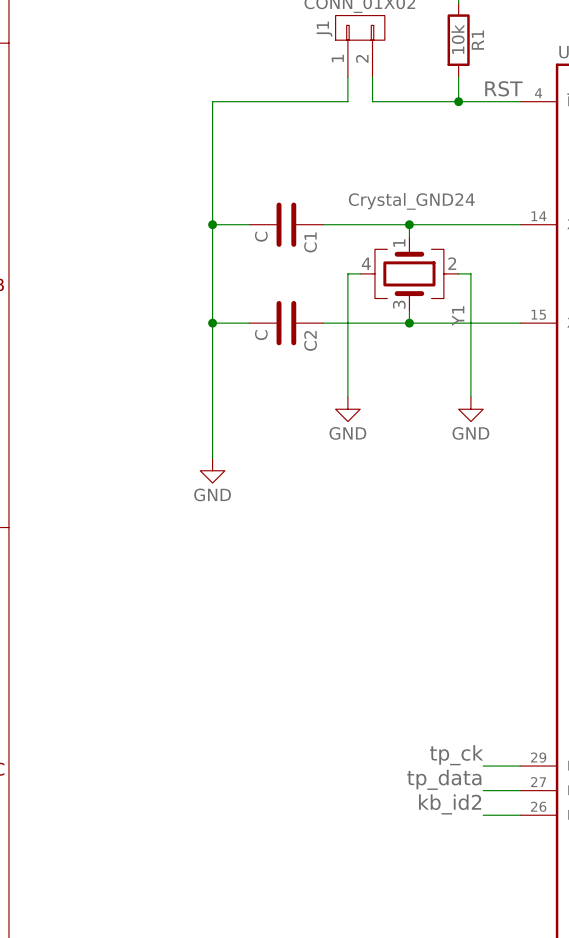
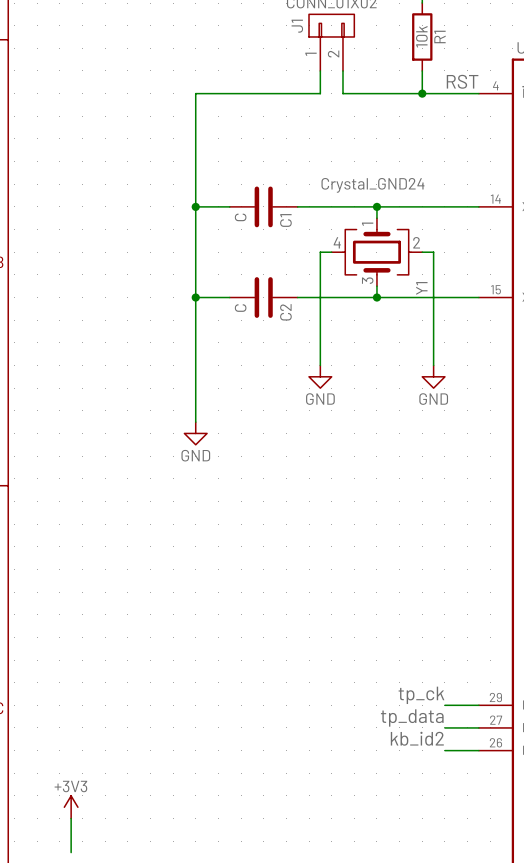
power symbol: none -> +3V3 (71, 807)
wire: none -> (71, 818) (71, 852)

